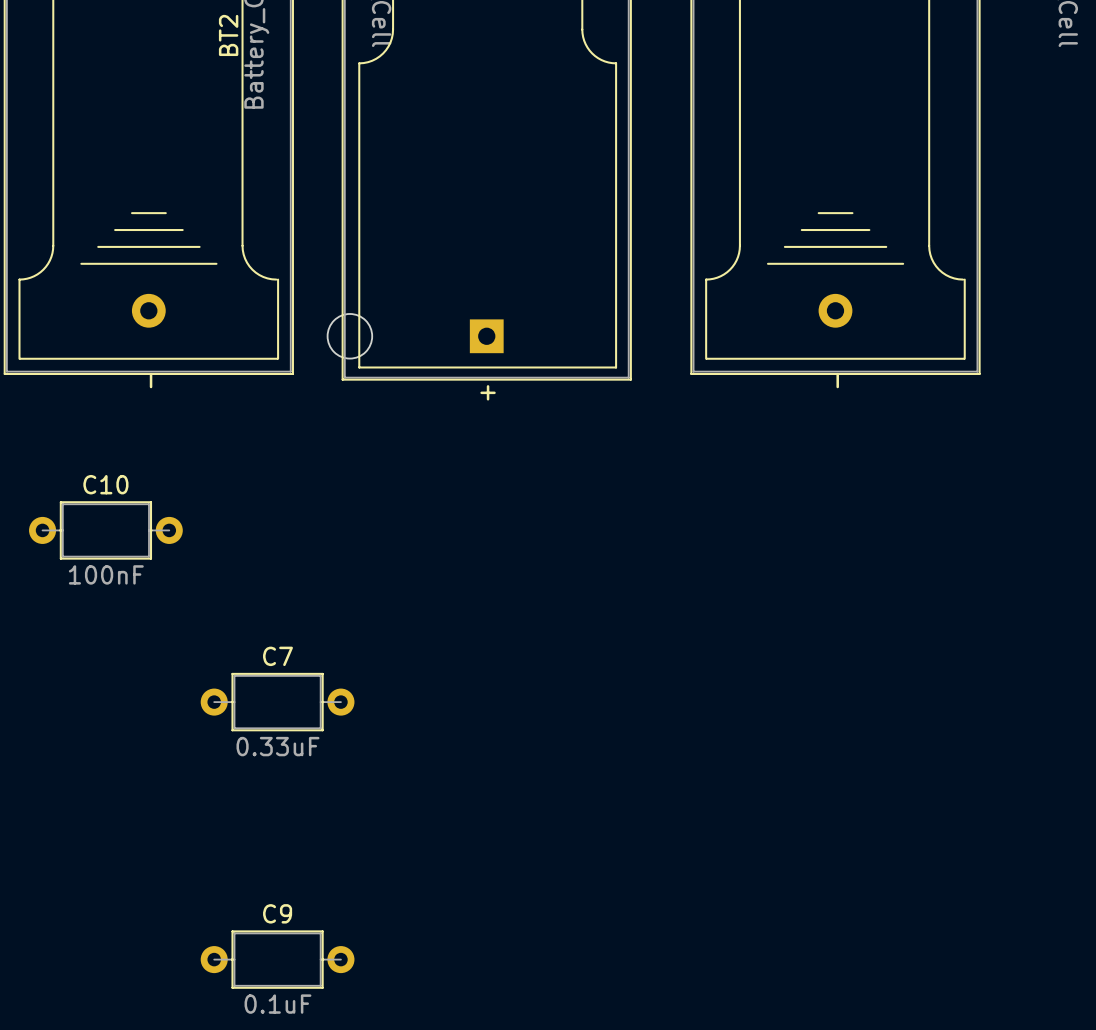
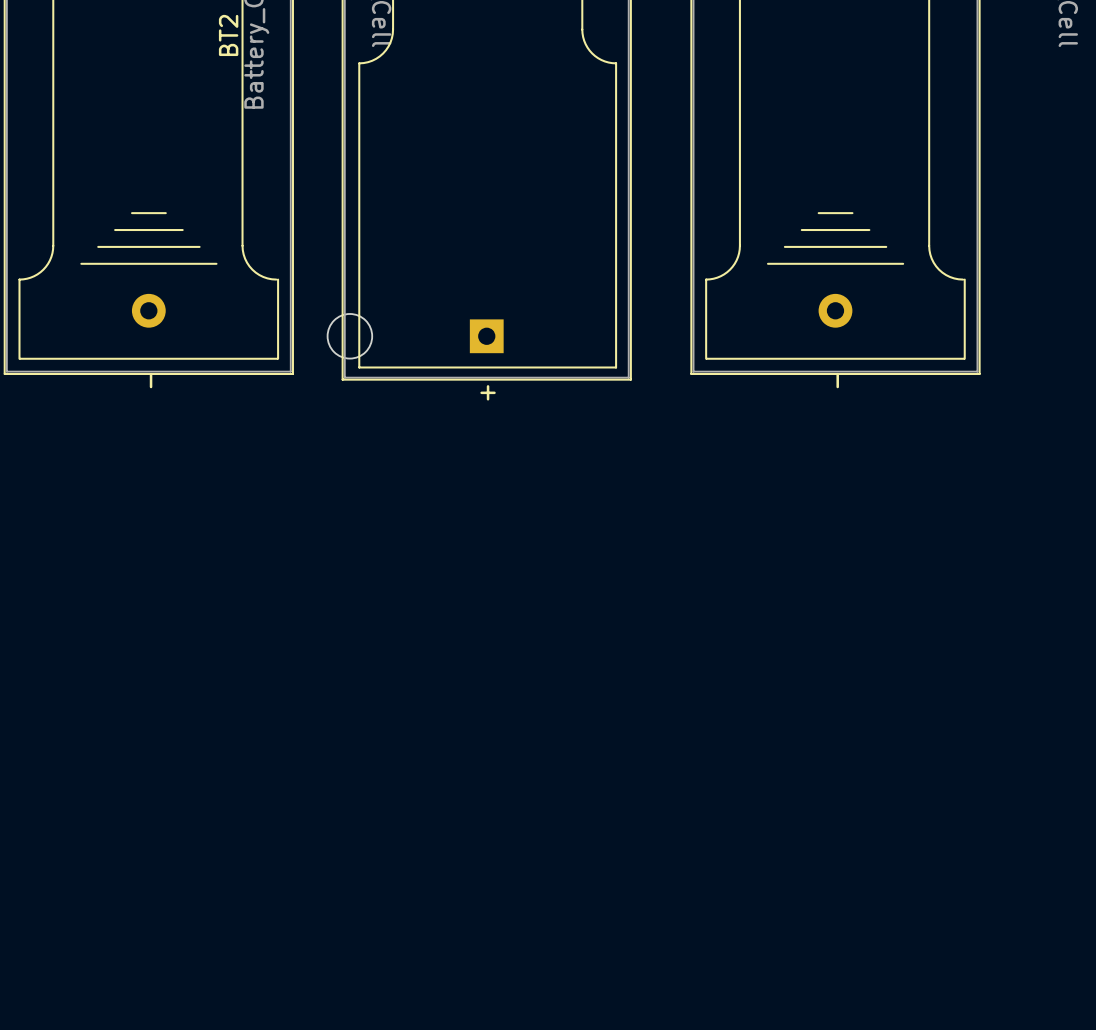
C10: 100nF (105, 530) -> none
C7: 0.33uF (277, 702) -> none
C9: 0.1uF (277, 959) -> none

